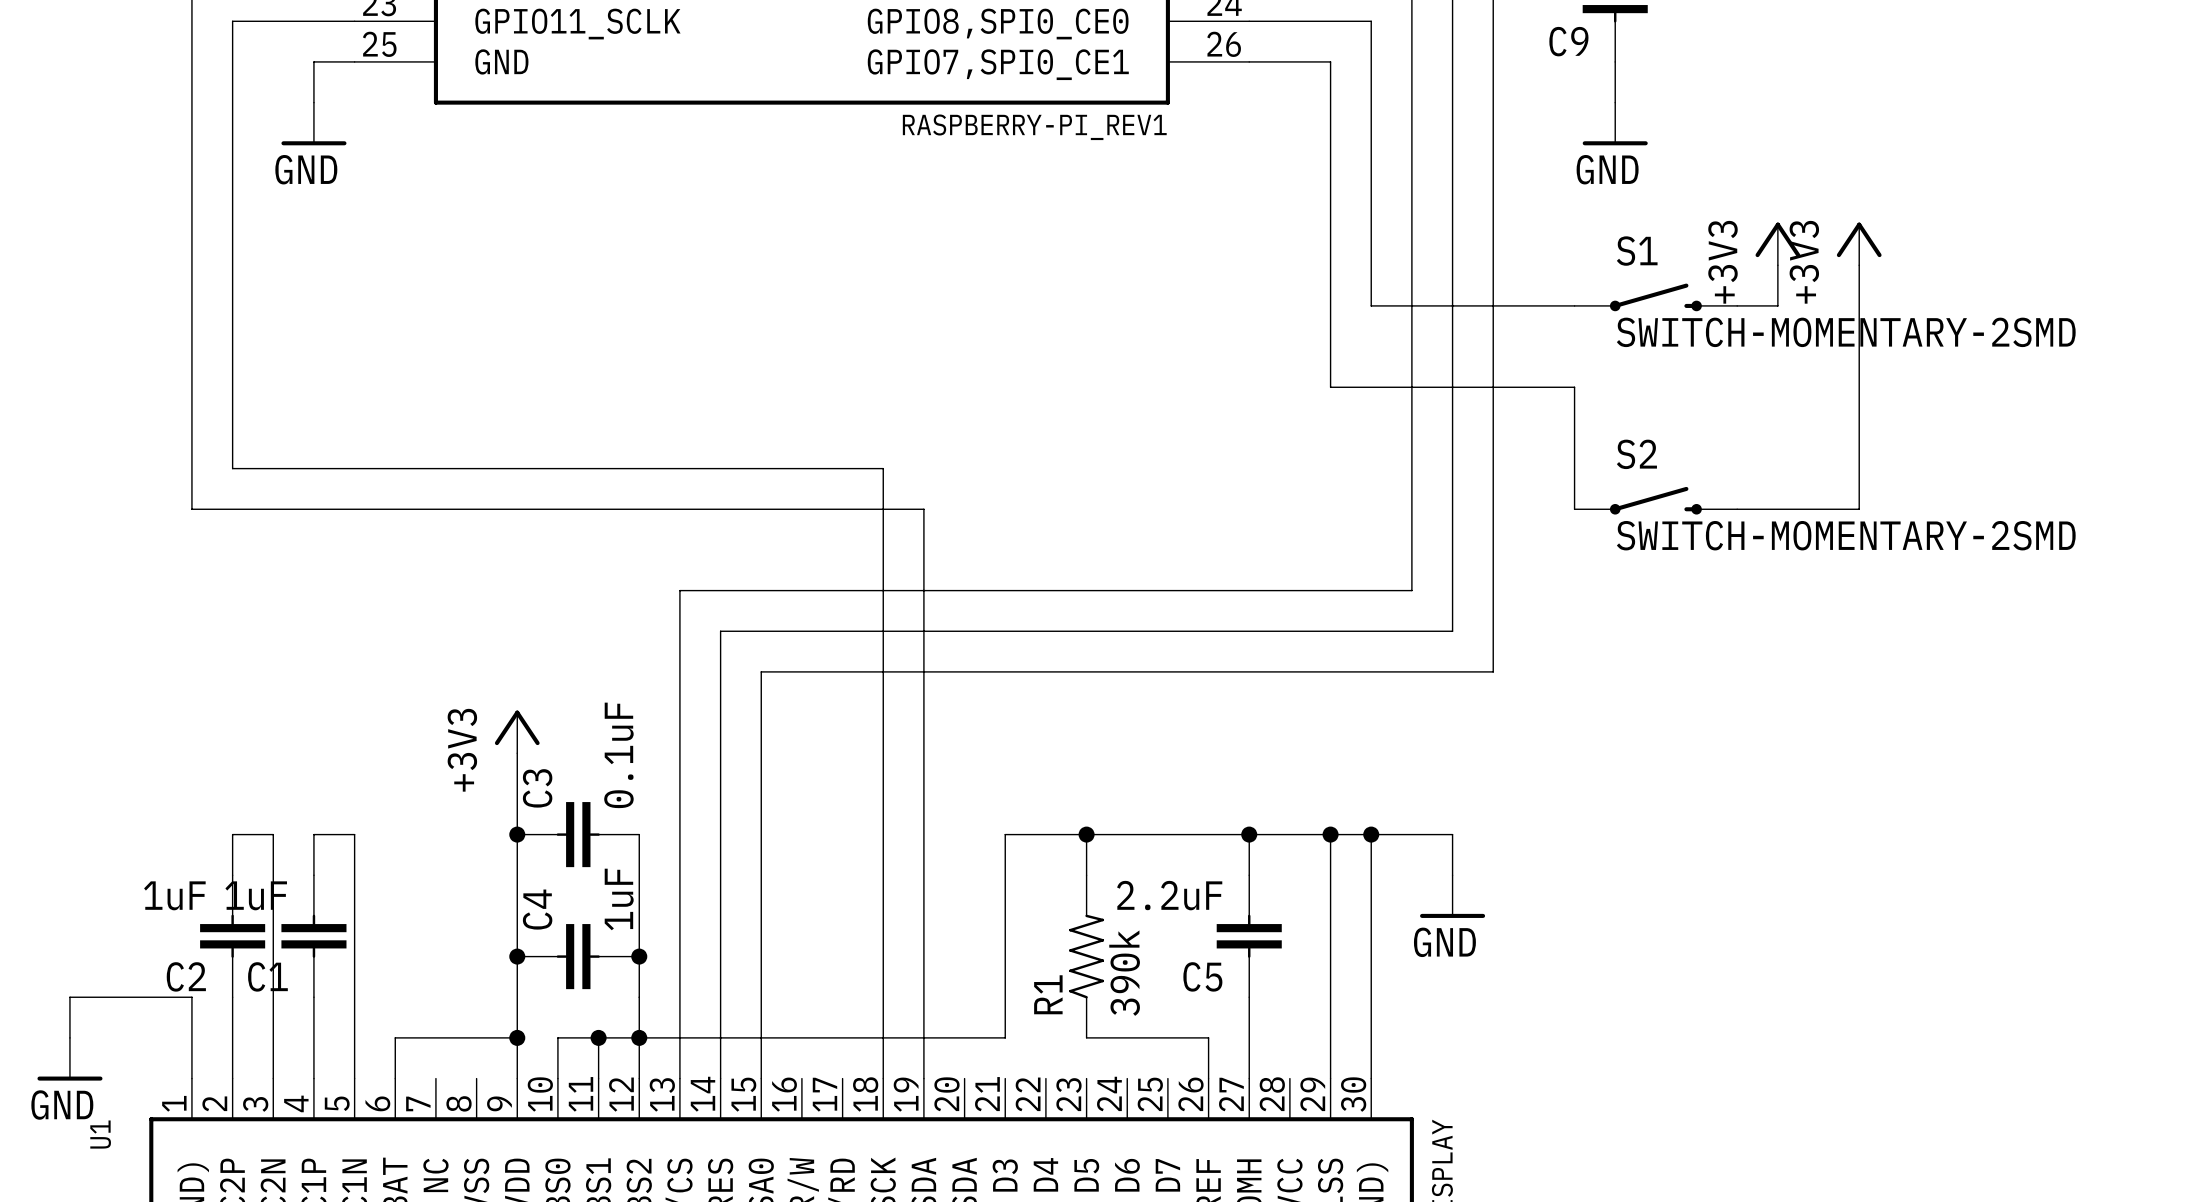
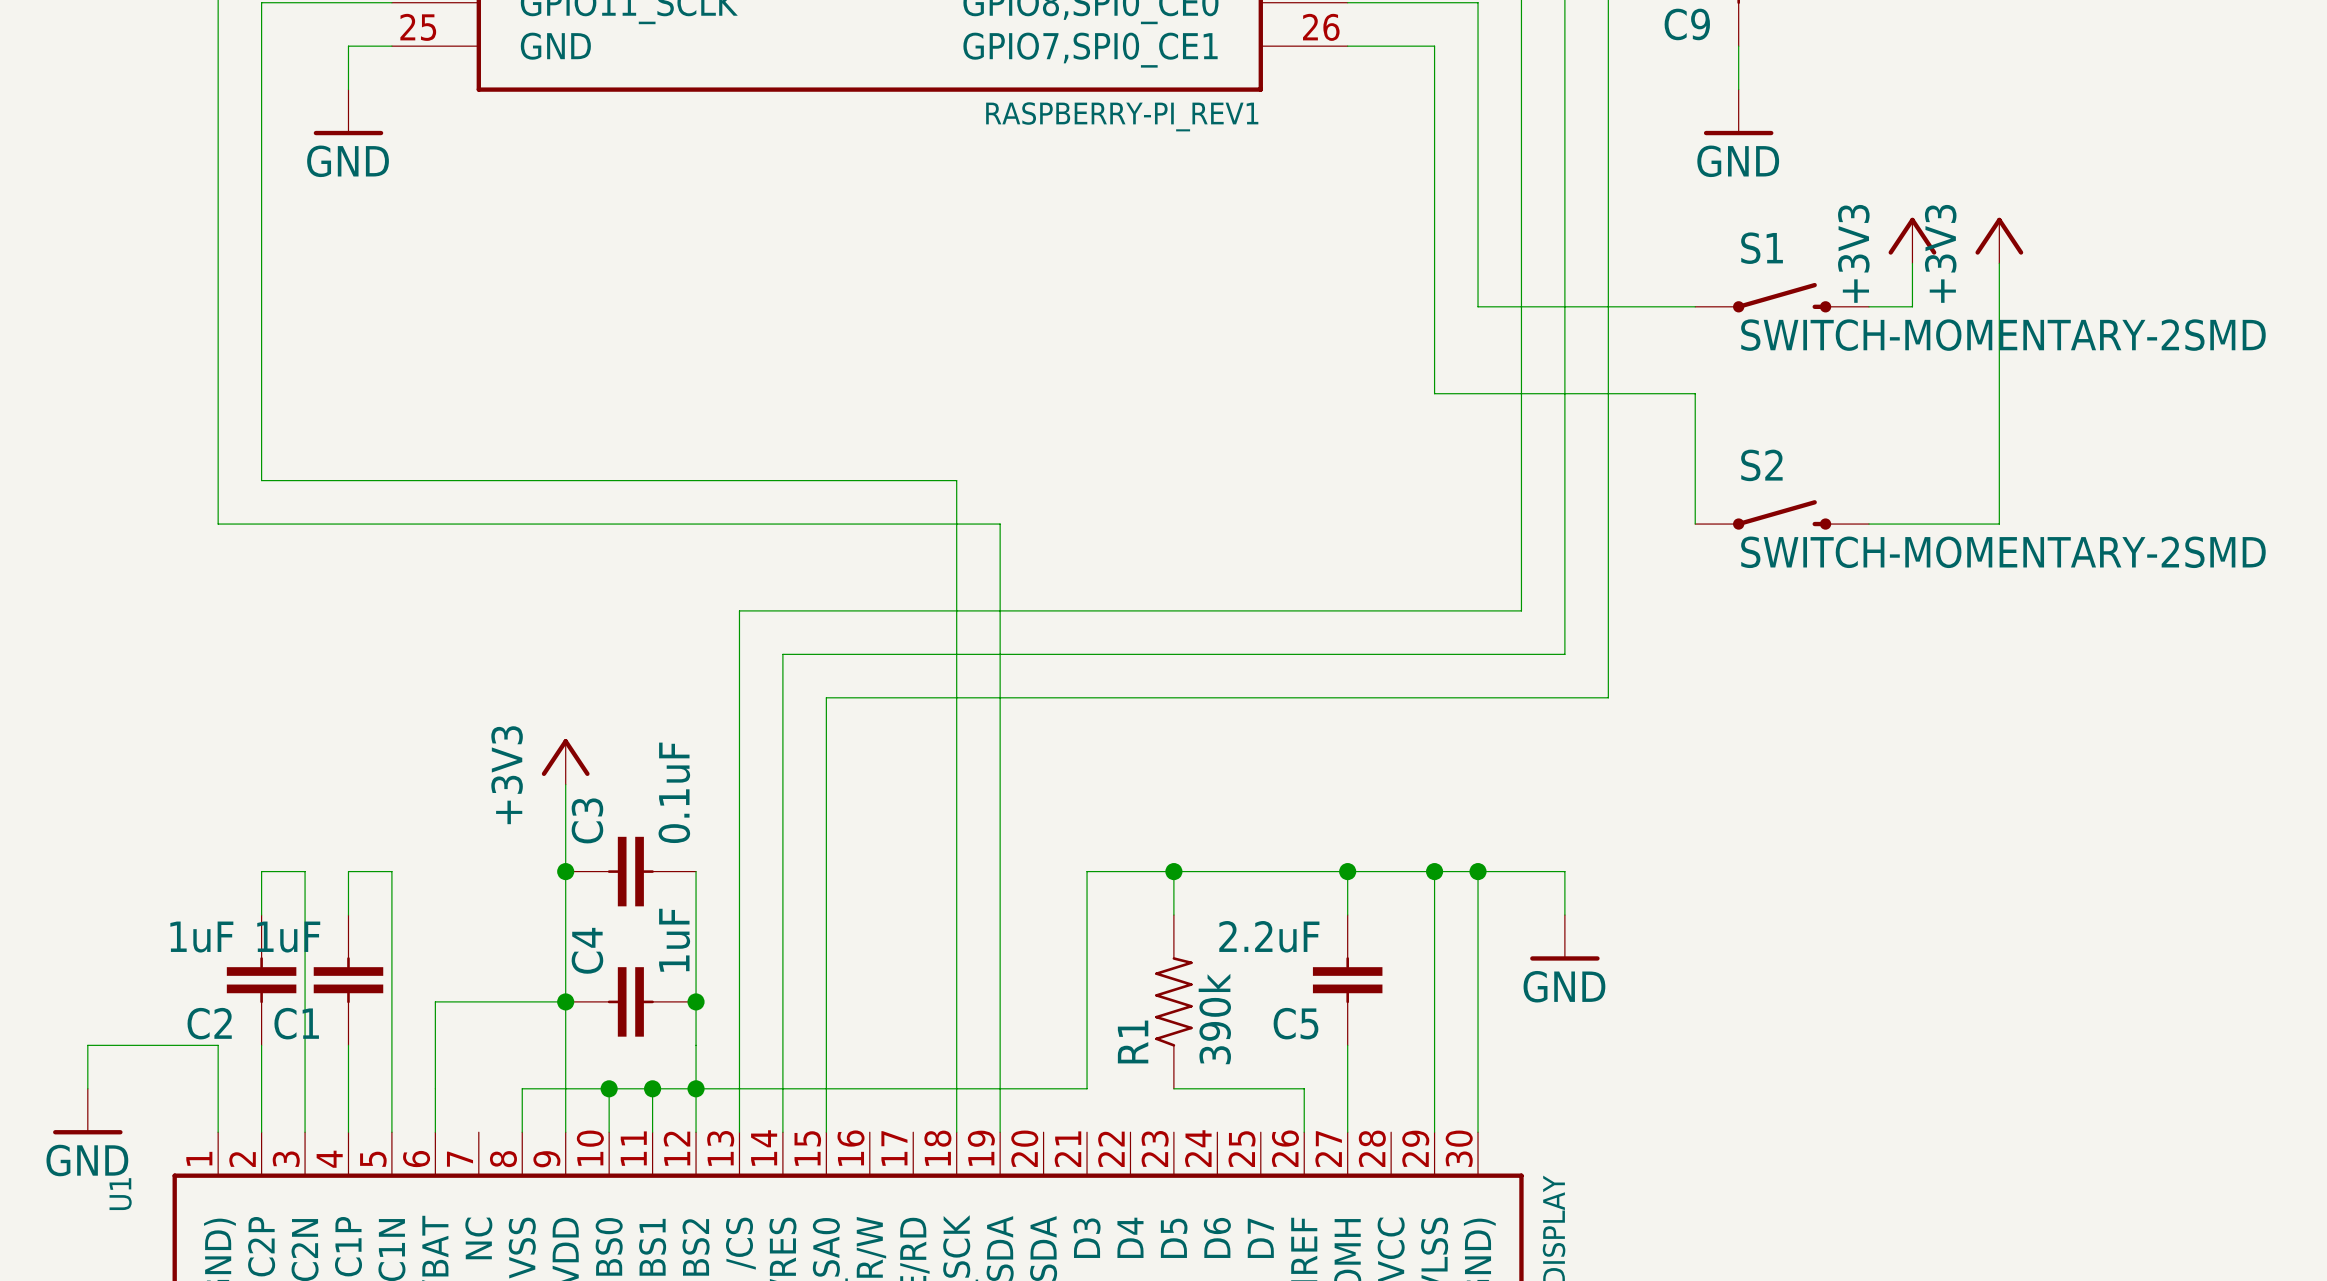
wire: (395, 1037) (476, 1037) -> (435, 1088) (435, 1001) (565, 1001)
wire: none -> (522, 1088) (522, 1132)
wire: none -> (565, 1088) (609, 1088)
junction position: (517, 1037) -> (609, 1088)

